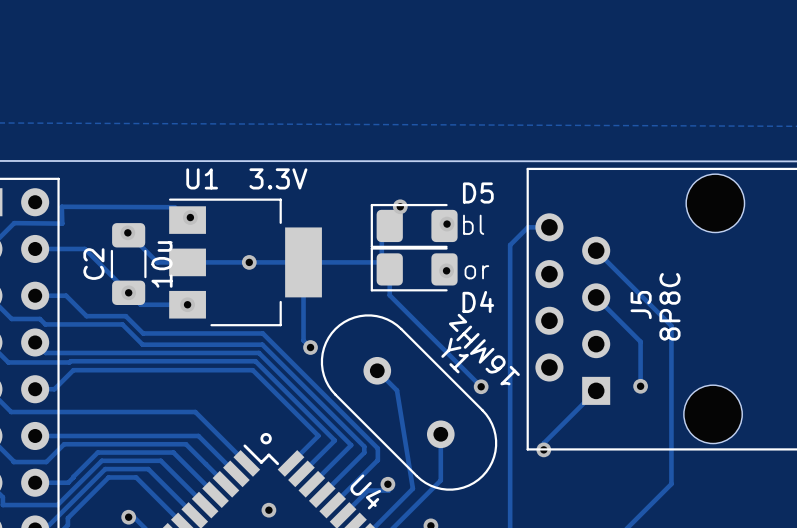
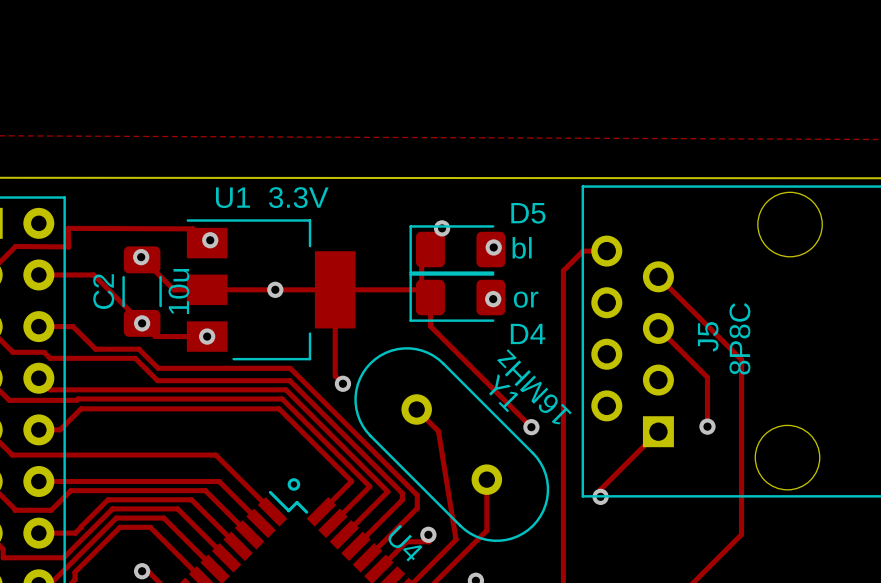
via: (268, 510) -> none

